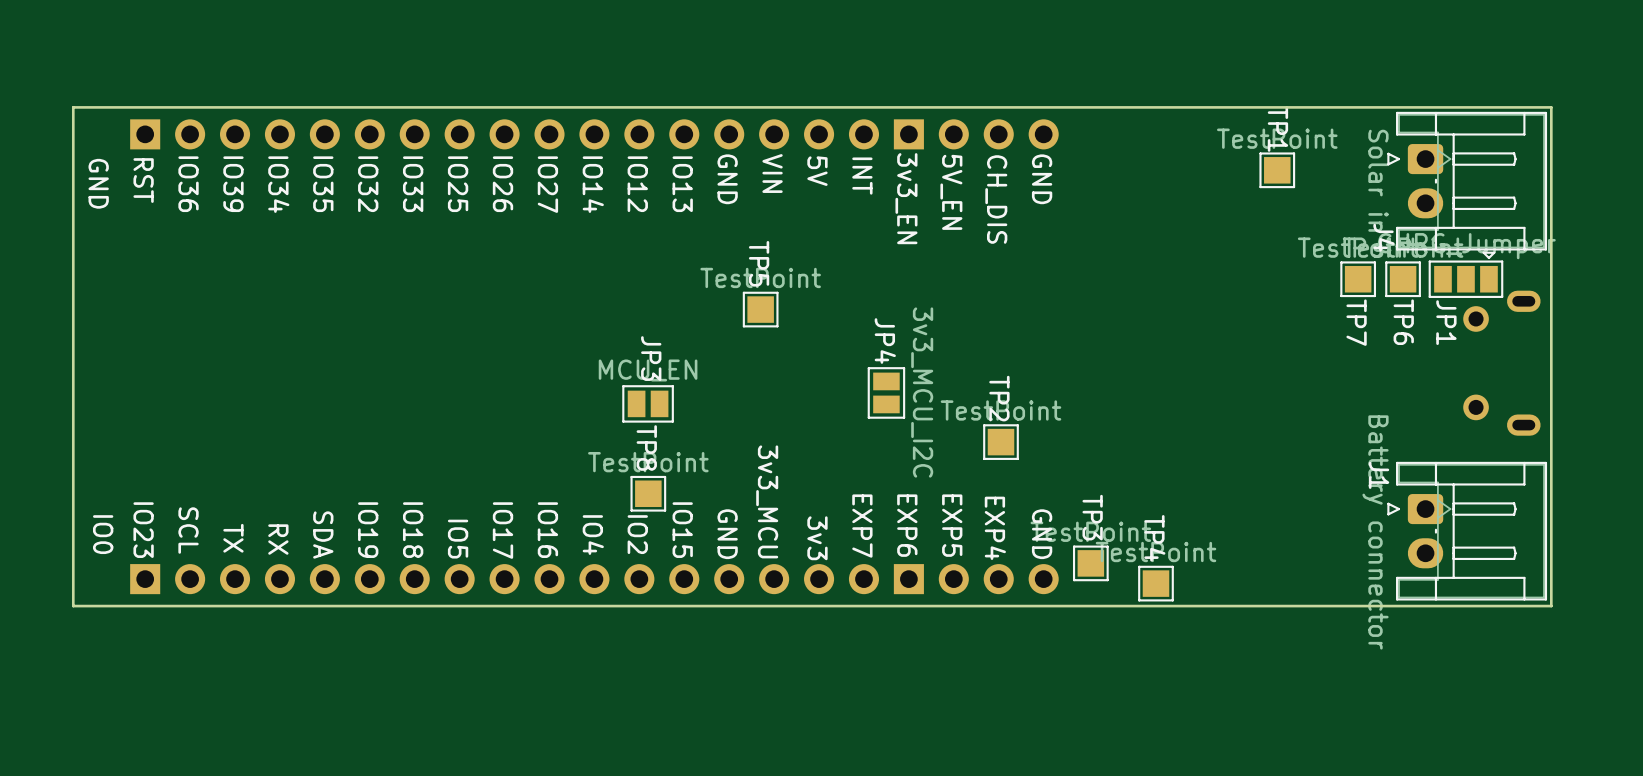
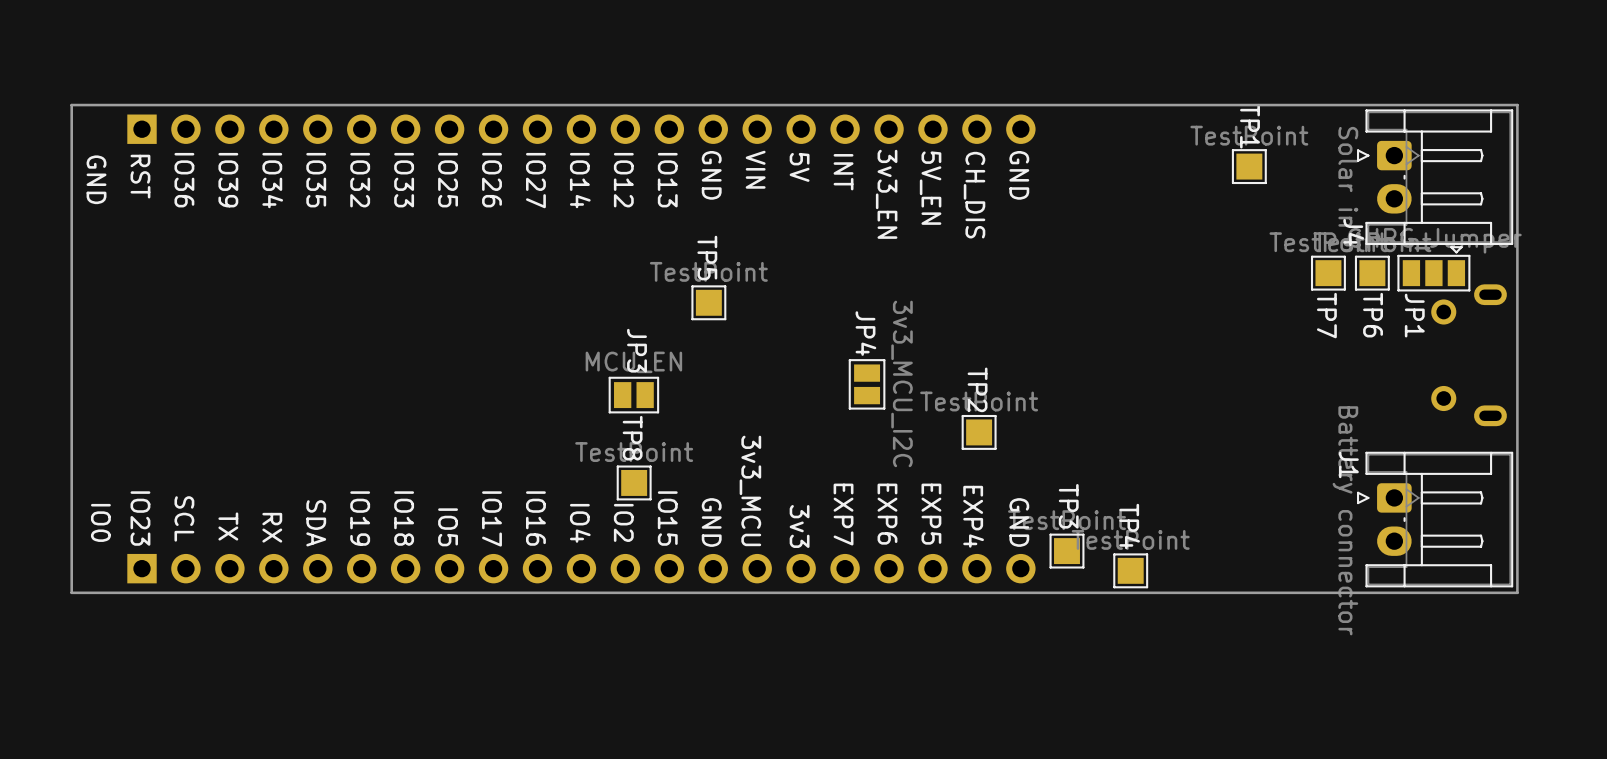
part: none -> (581, 129)
part: (504, 134) -> none
part: (976, 134) -> none
TP5 position: (760, 309) -> (708, 302)
part: (504, 579) -> none
part: (976, 579) -> none
part: none -> (581, 568)

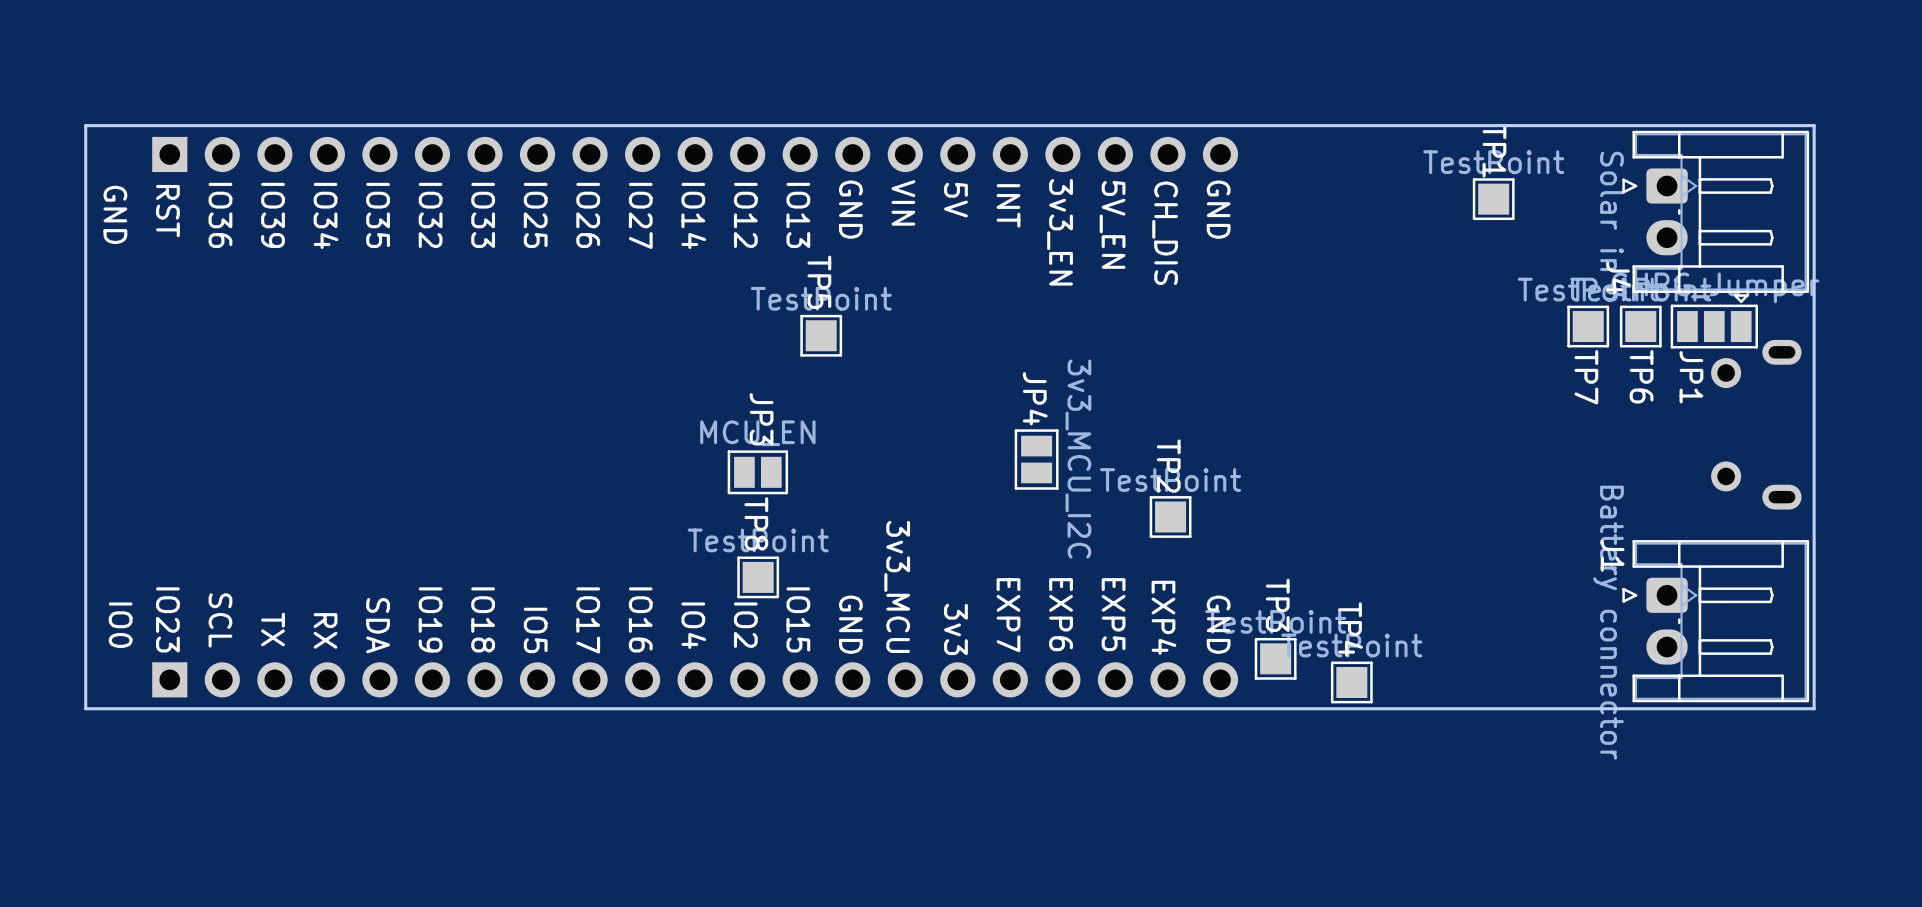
TP5 position: (708, 302) -> (821, 335)

